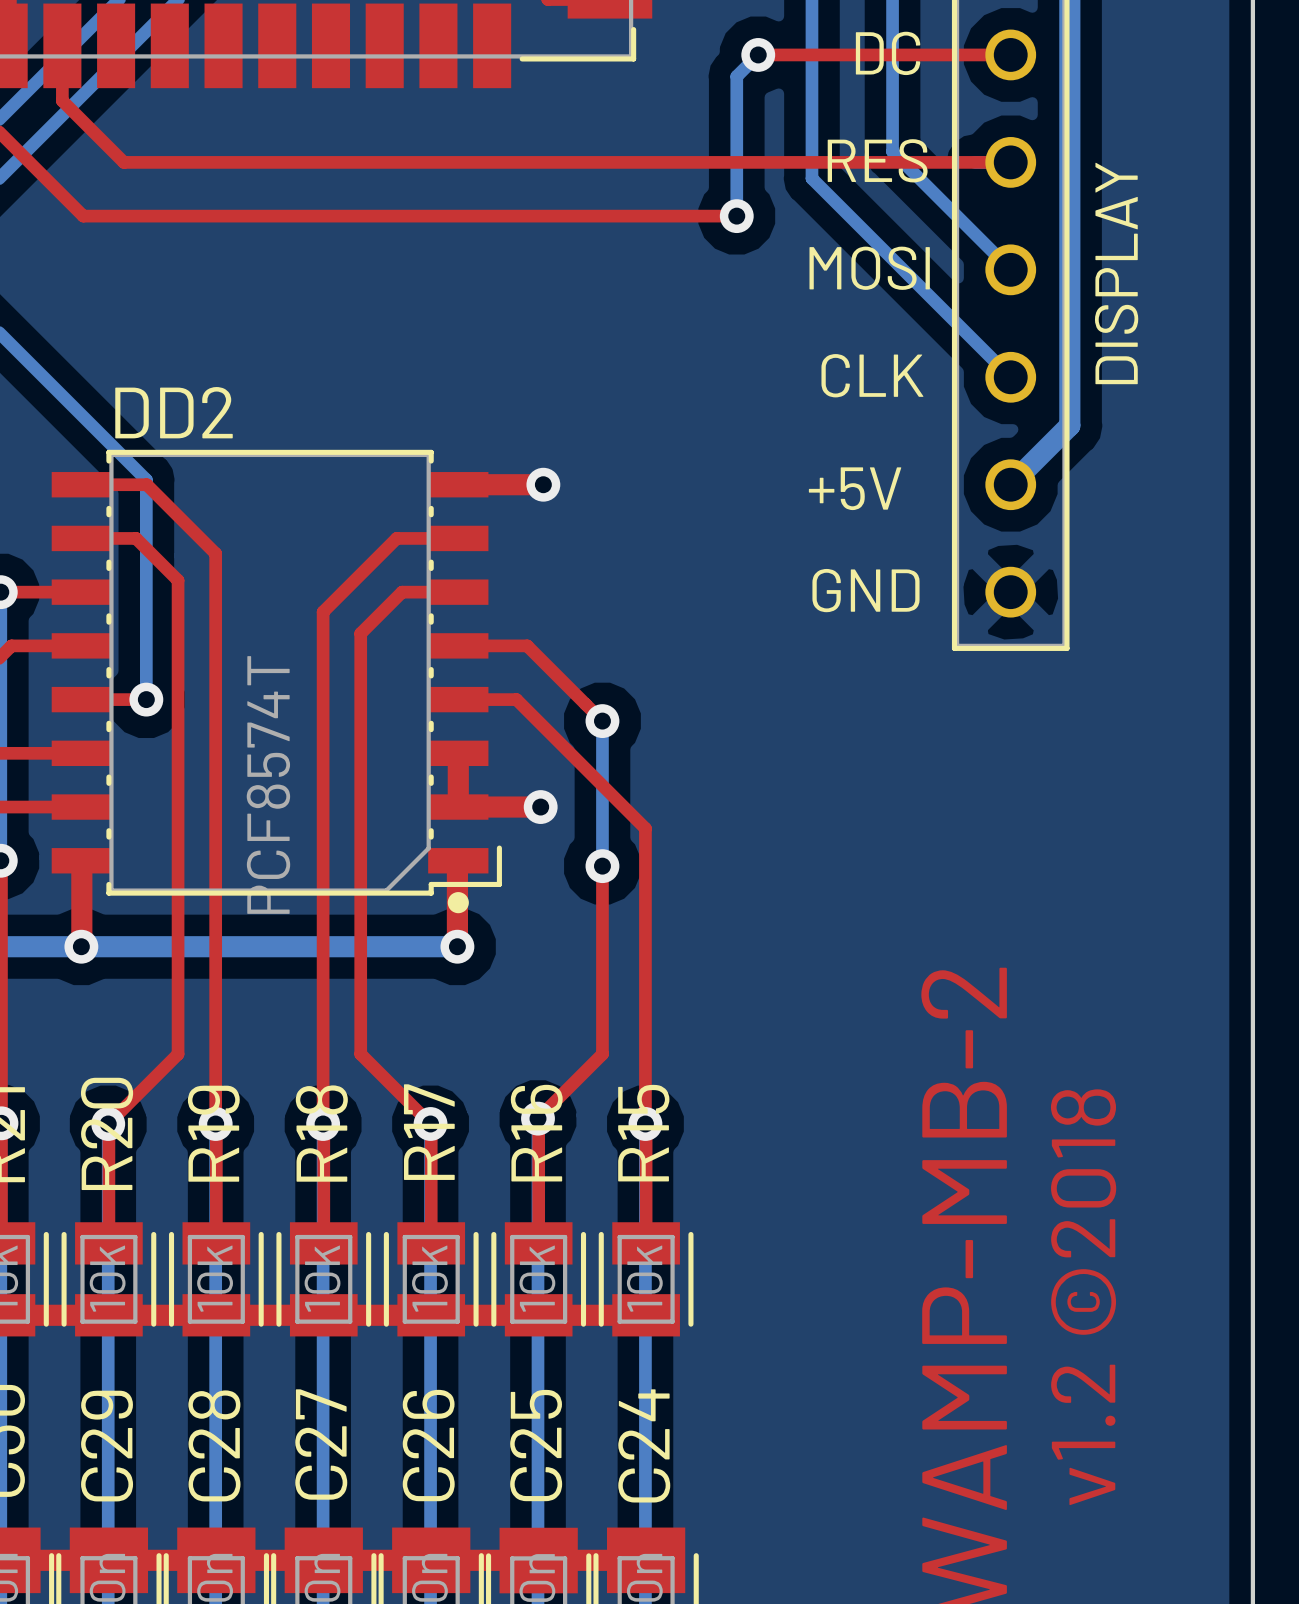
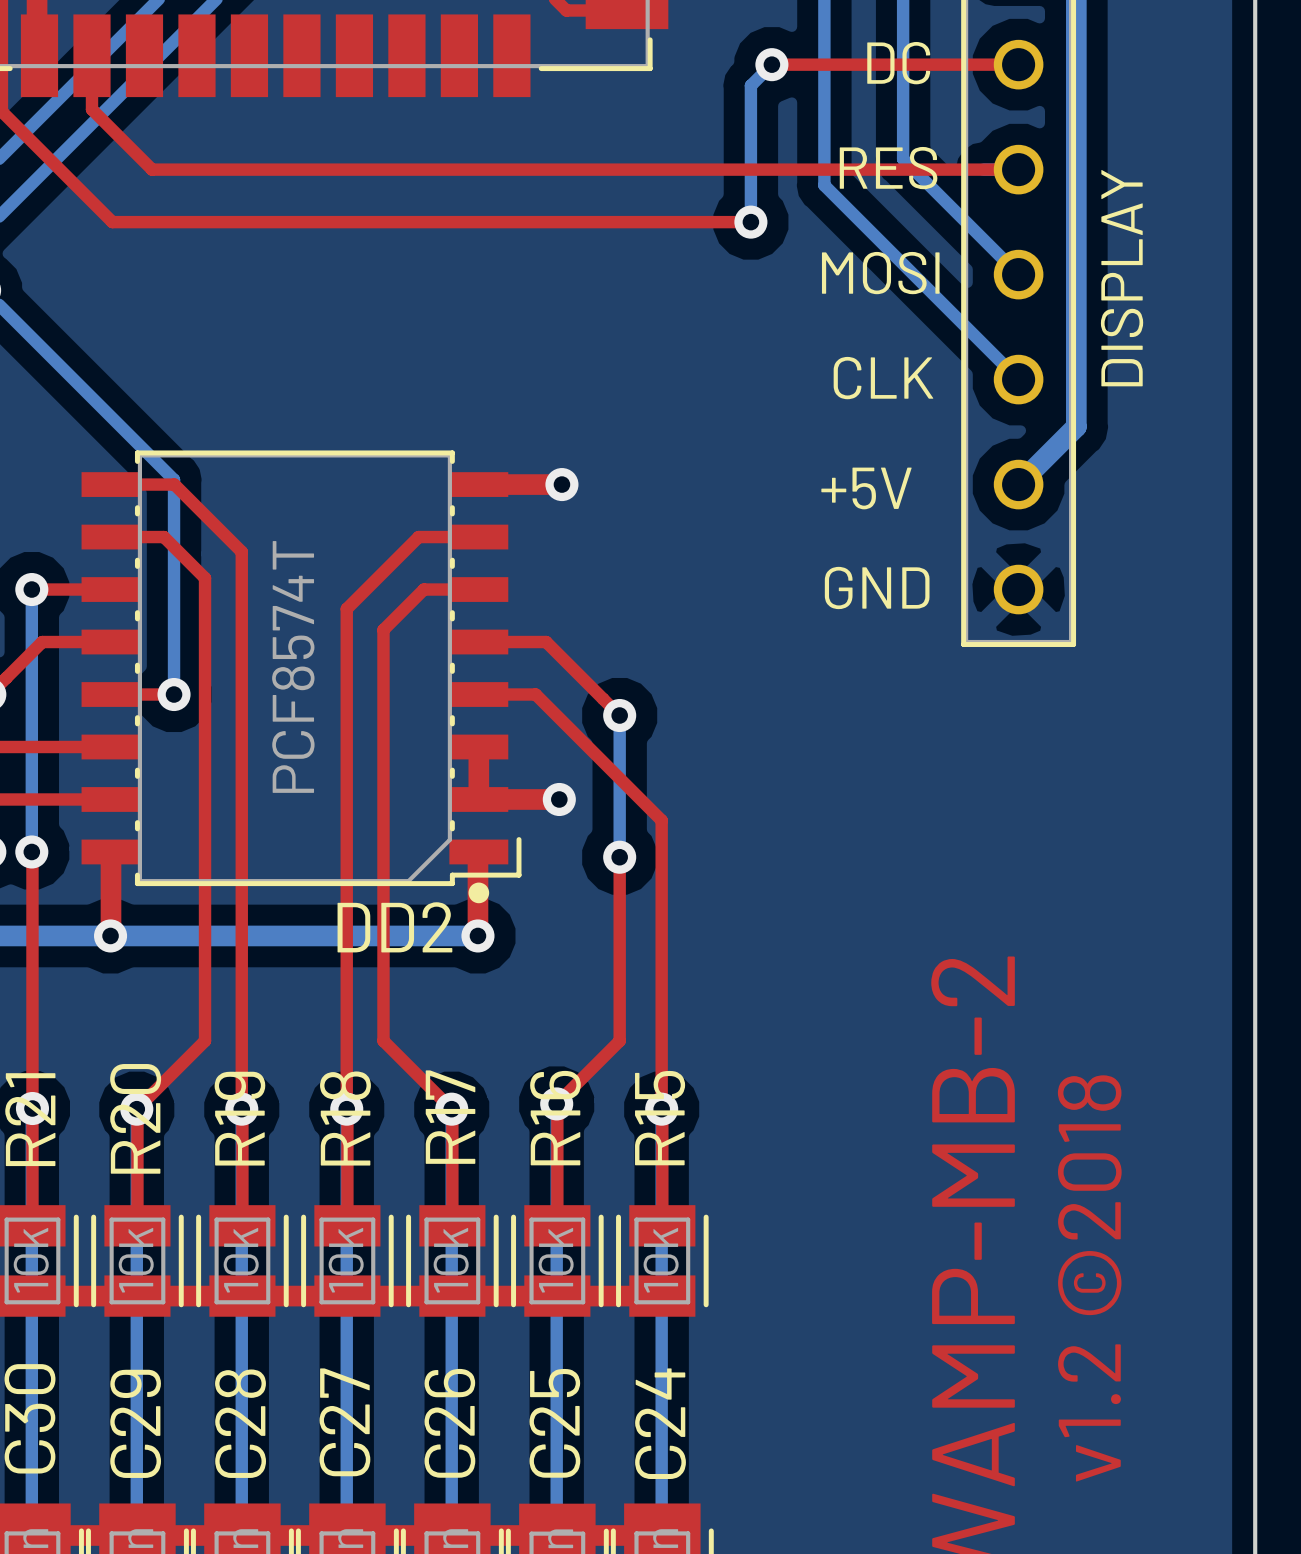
DD2 name position: DD2 (174, 412) -> DD2 (394, 927)
DD2 value position: PCF8574T (268, 784) -> PCF8574T (293, 666)

